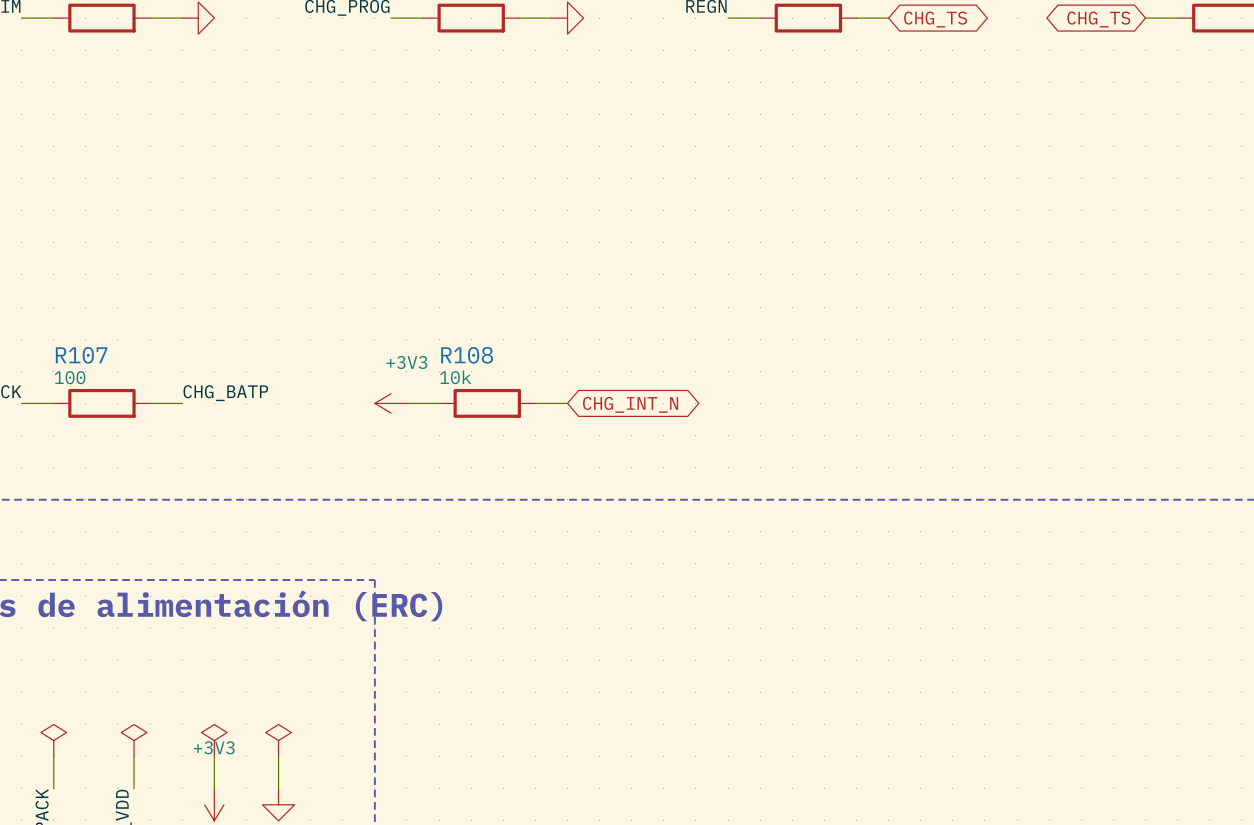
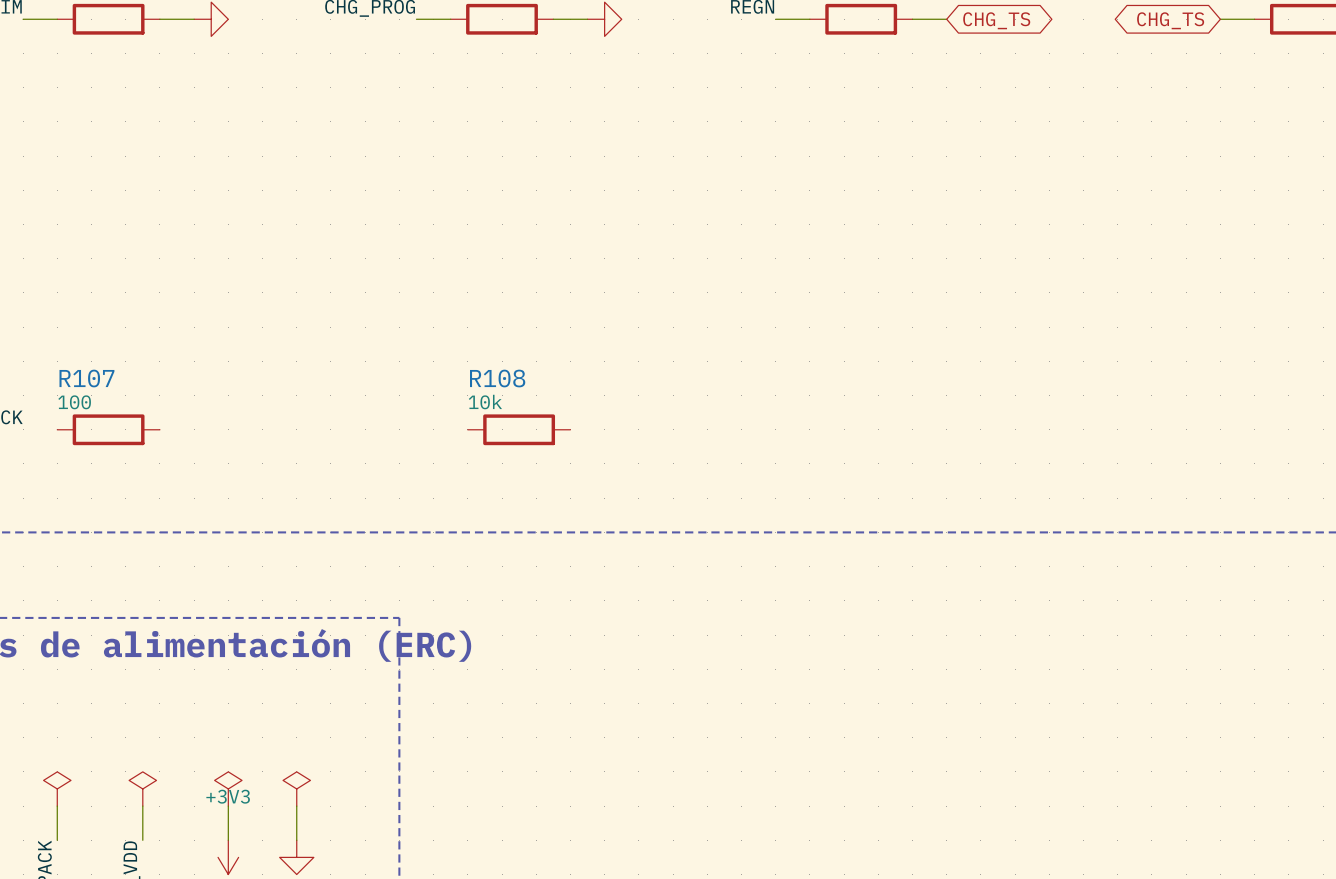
label: CHG_BATP (225, 393) -> none
wire: (21, 403) (53, 403) -> none
wire: (150, 403) (182, 403) -> none
power symbol: +3V3 (390, 403) -> none
wire: (406, 403) (439, 403) -> none
wire: (535, 403) (567, 403) -> none
global label: CHG_INT_N (630, 404) -> none

